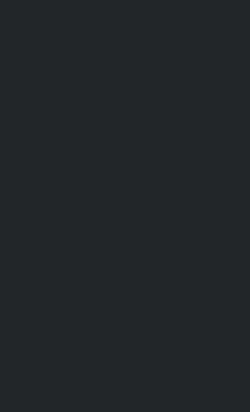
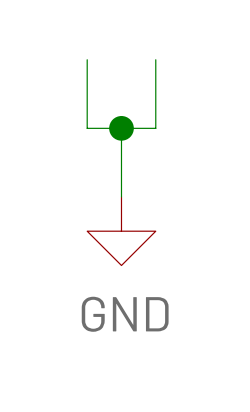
wire: none -> (87, 59) (87, 128) (155, 128) (155, 59)
wire: none -> (121, 128) (121, 196)
junction: none -> (121, 128)
power symbol: none -> GND (121, 231)

